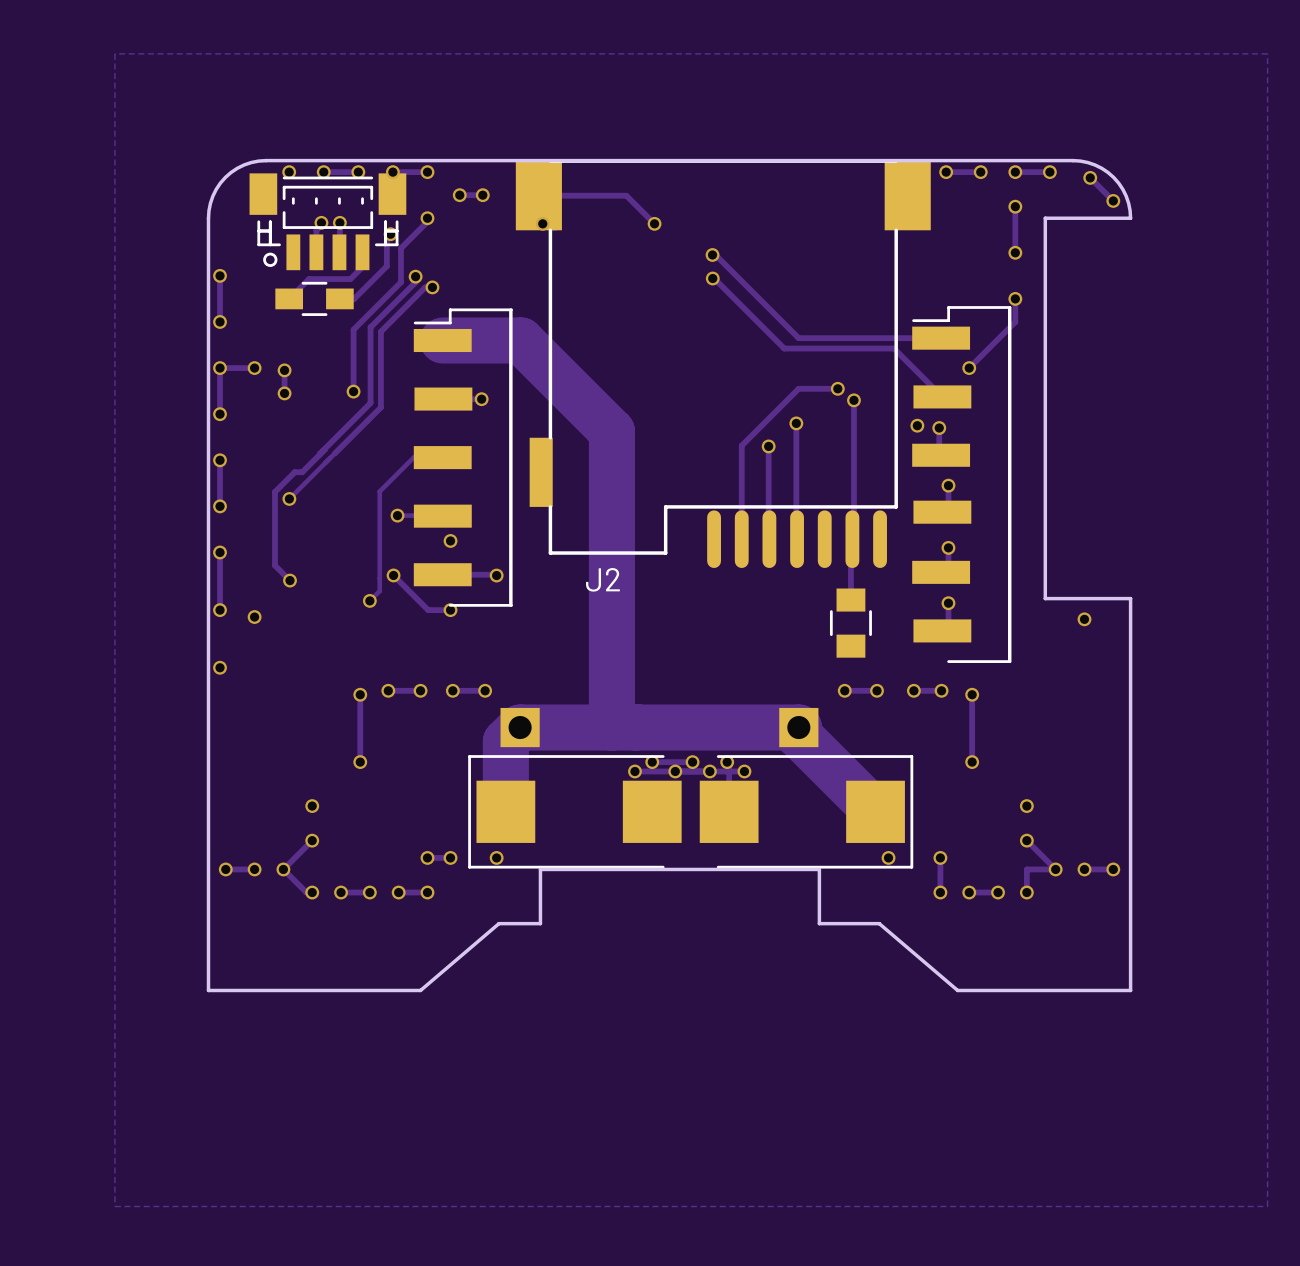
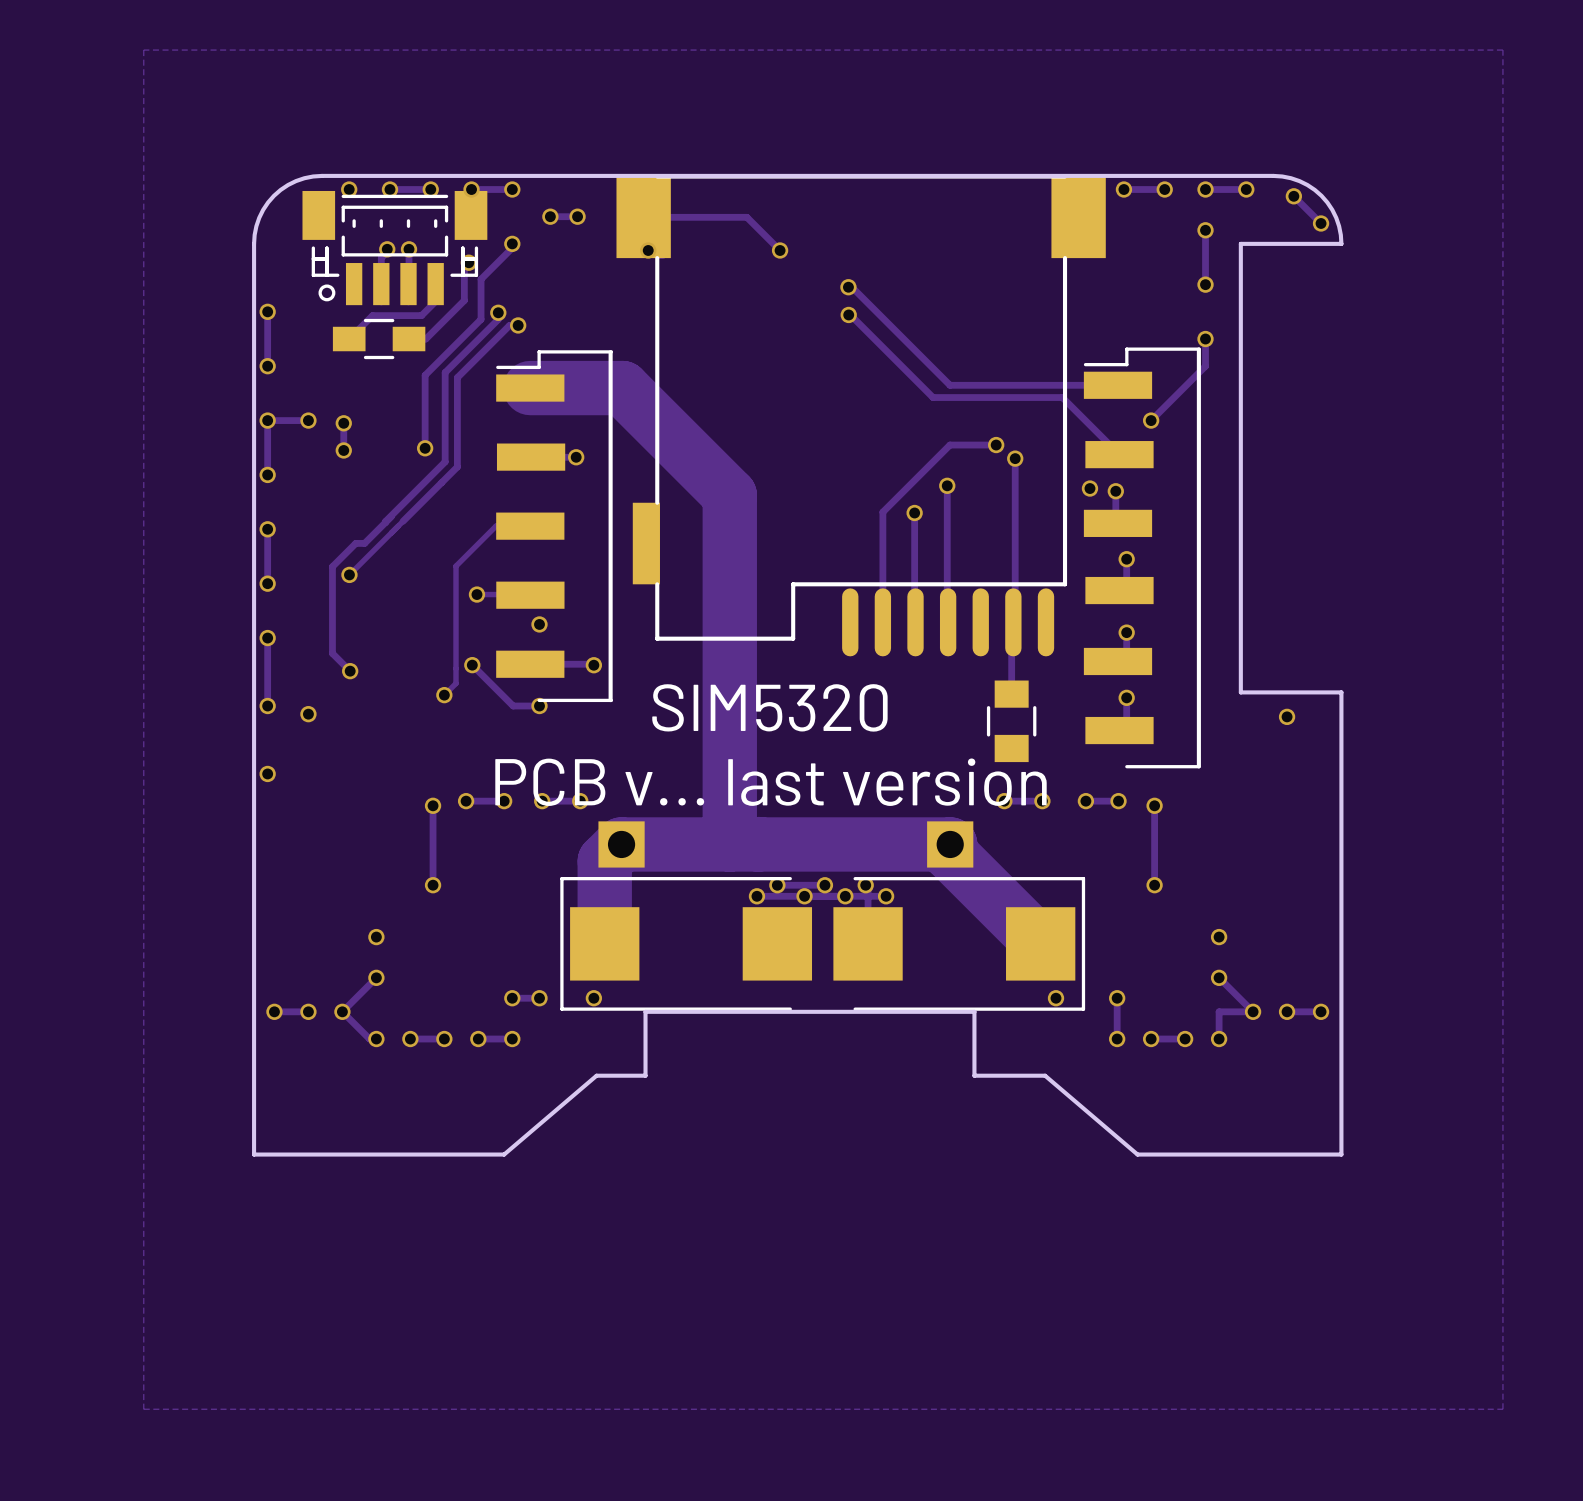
J2 name: J2 (602, 579) -> none
text: none -> SIM5320 (769, 707)
text: none -> PCB v... last version (770, 782)

